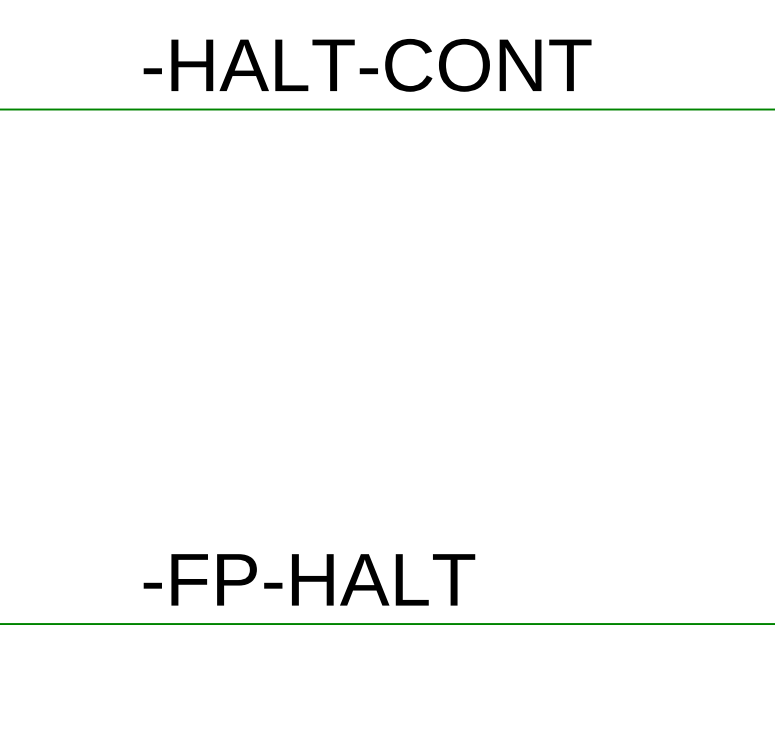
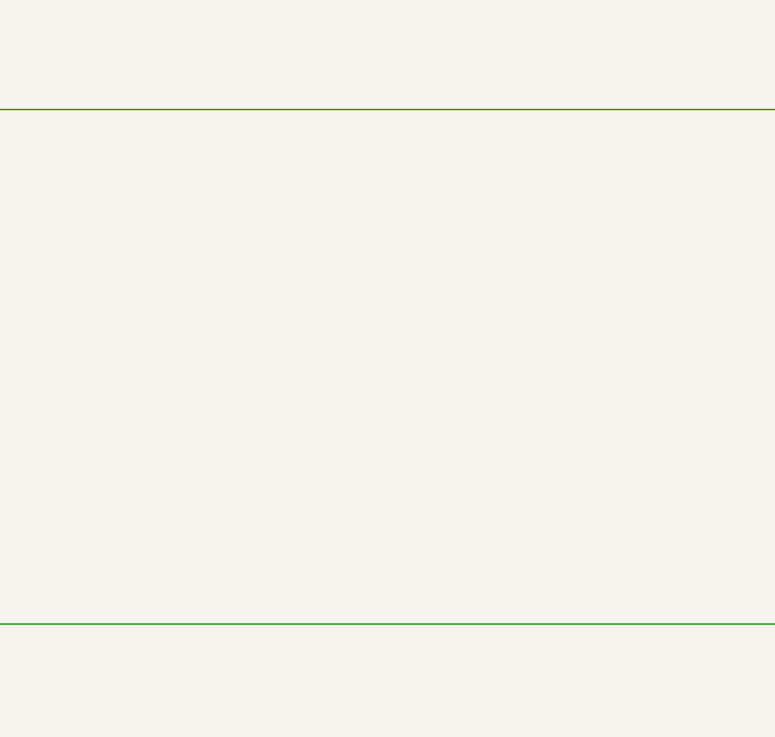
label: -HALT-CONT (367, 65) -> none
label: -FP-HALT (309, 579) -> none

